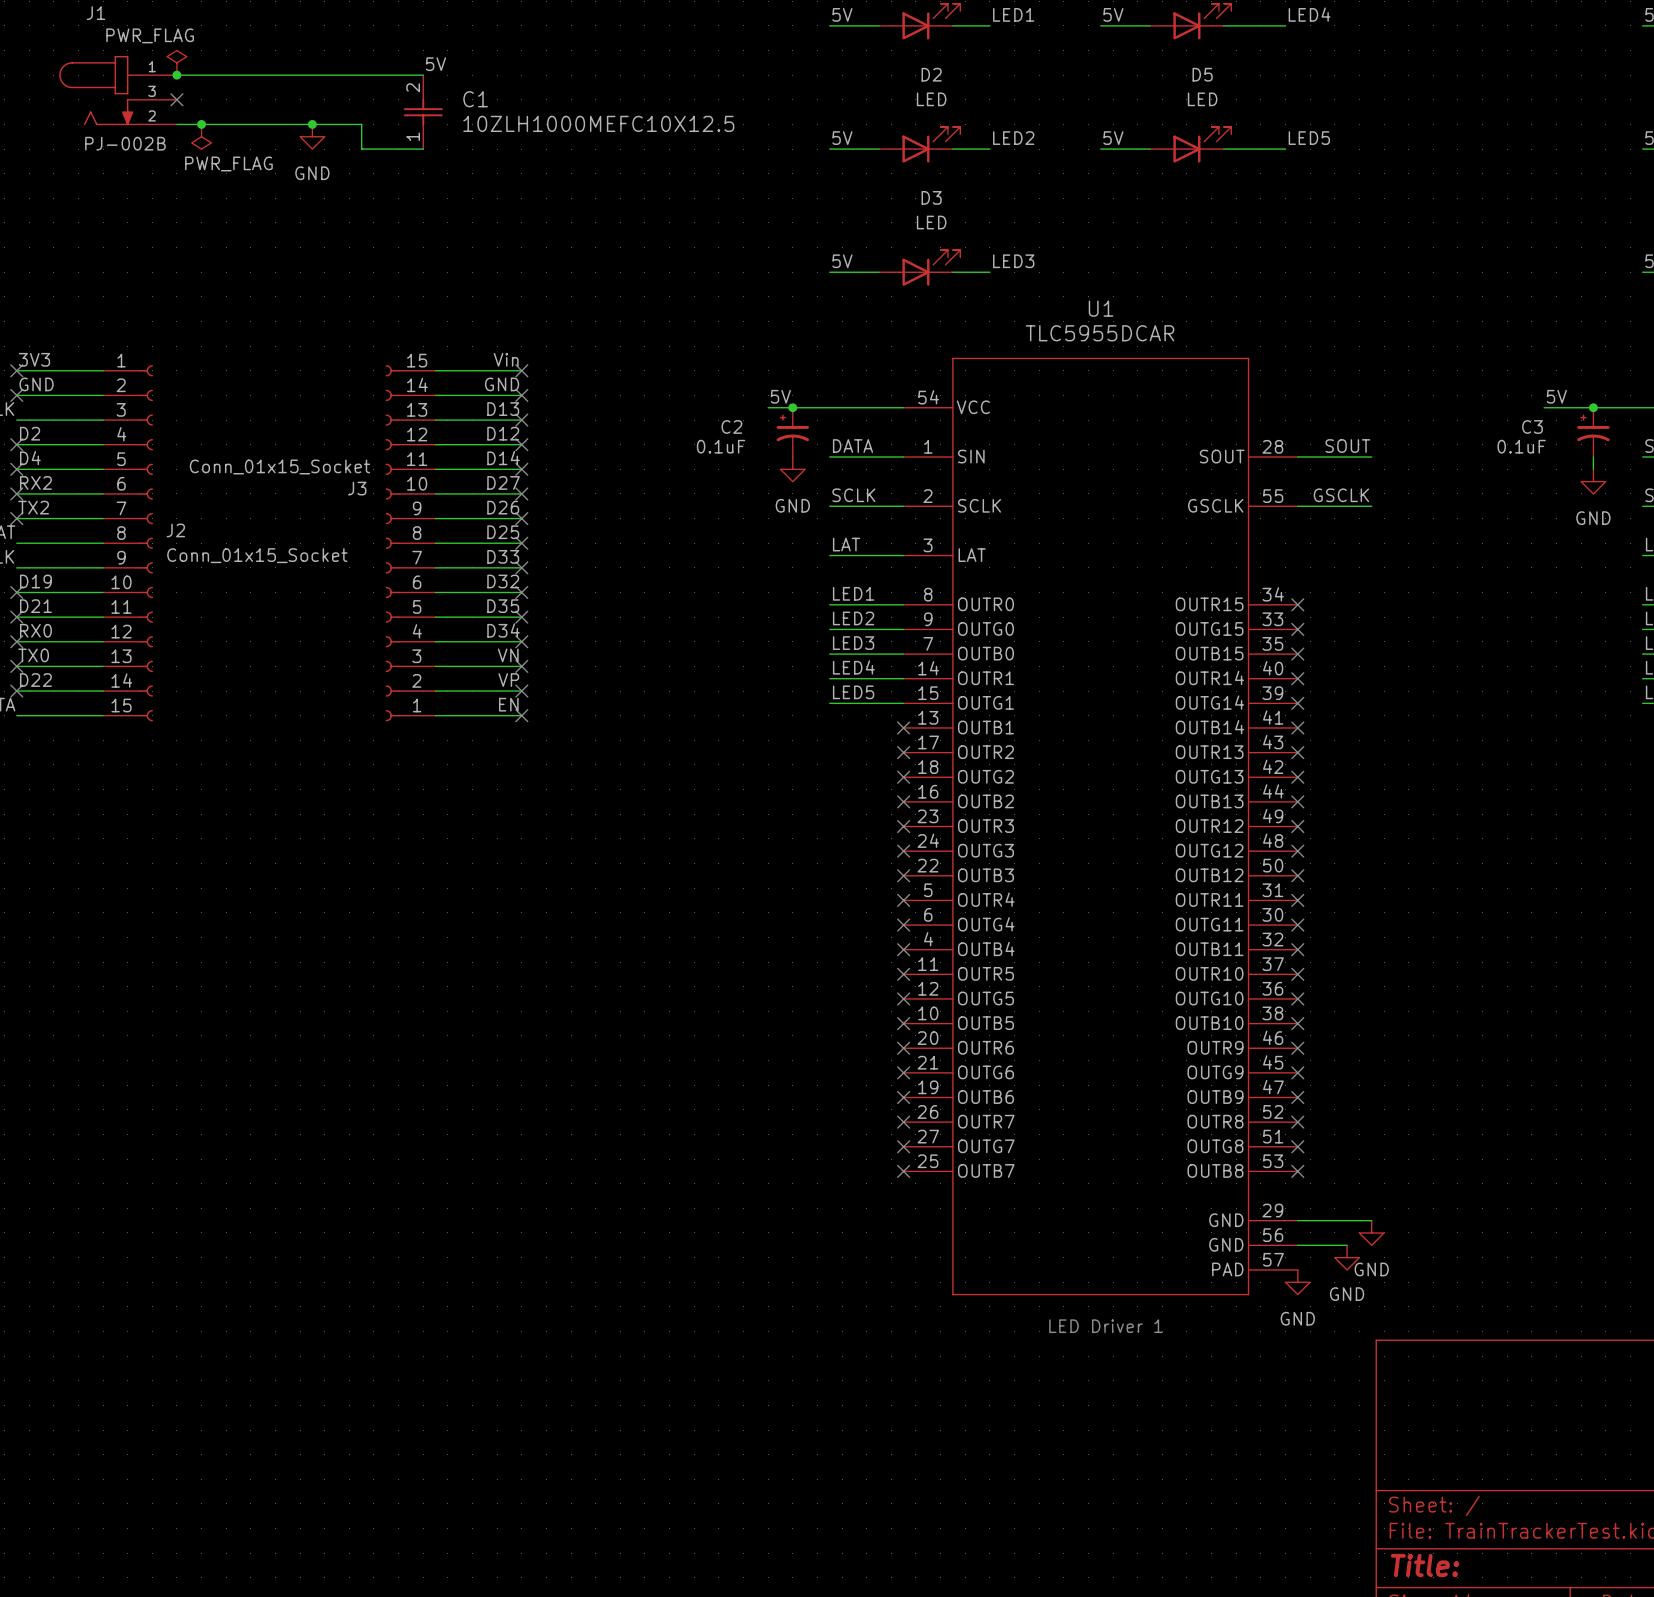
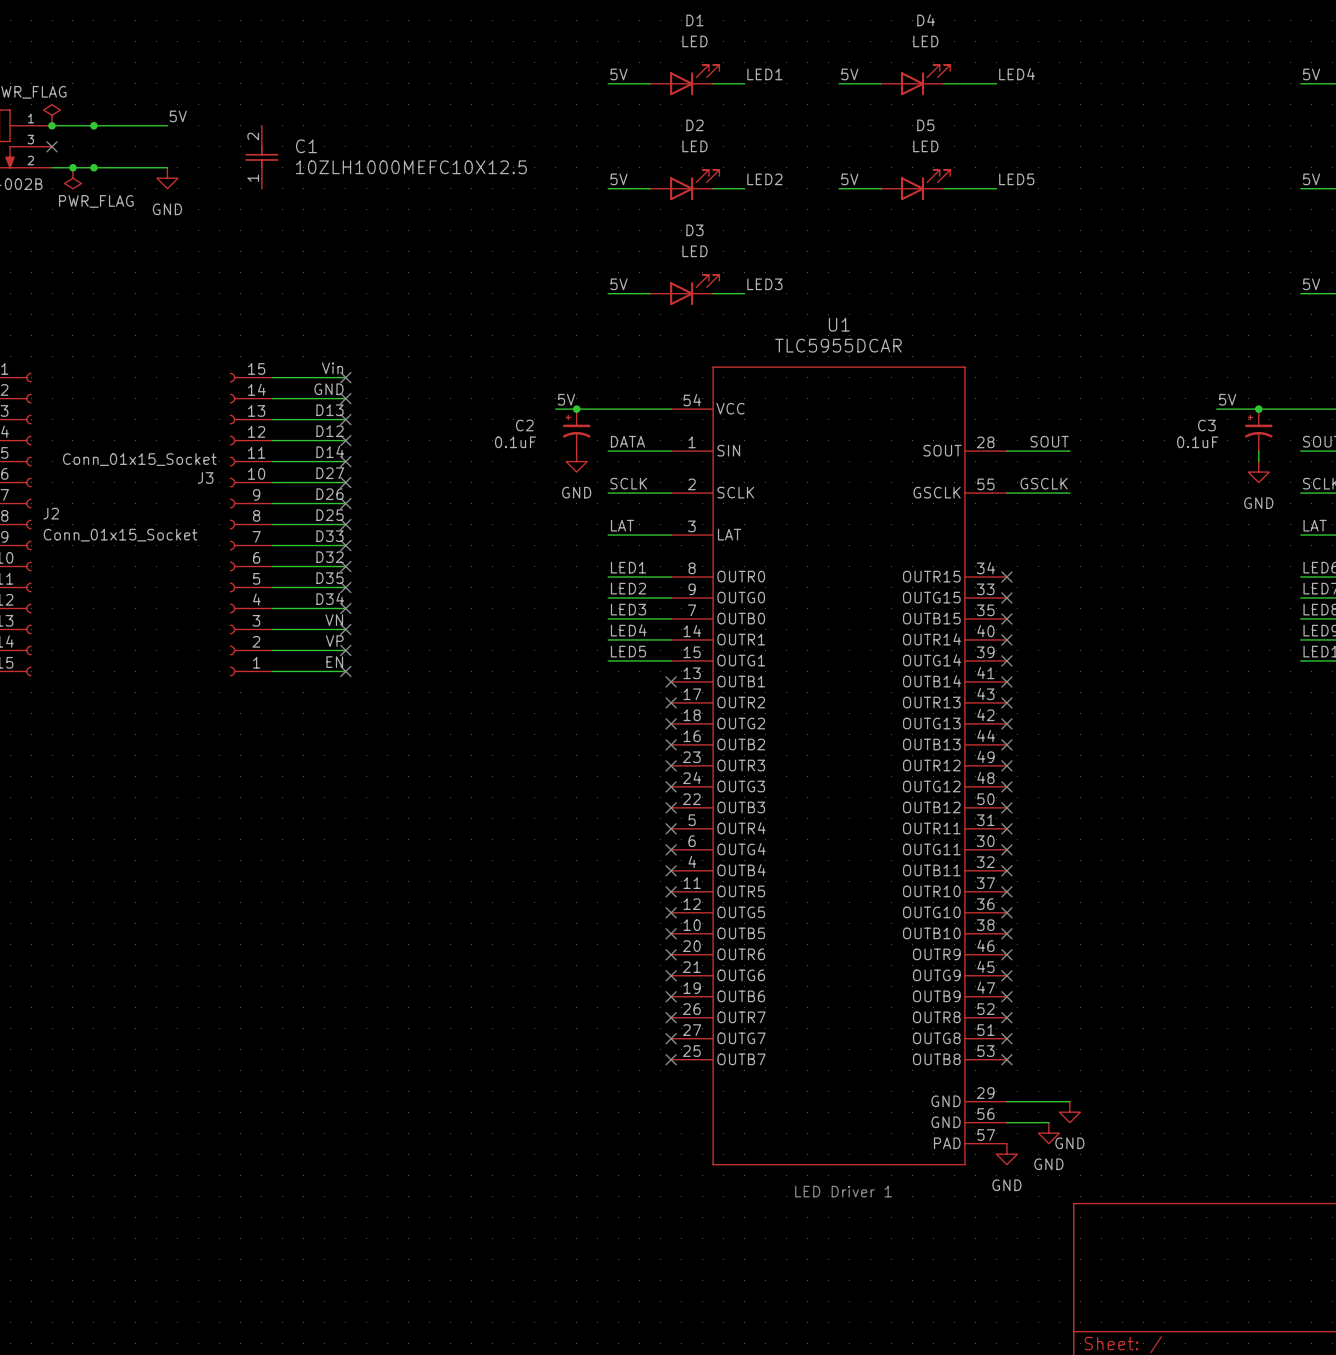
label position: 5V (435, 64) -> 5V (178, 116)
junction: none -> (93, 125)
wire: (312, 75) (423, 75) -> none
junction: none -> (93, 167)
wire: (312, 124) (361, 124) (361, 149) (423, 149) -> none
junction: (312, 124) -> none

